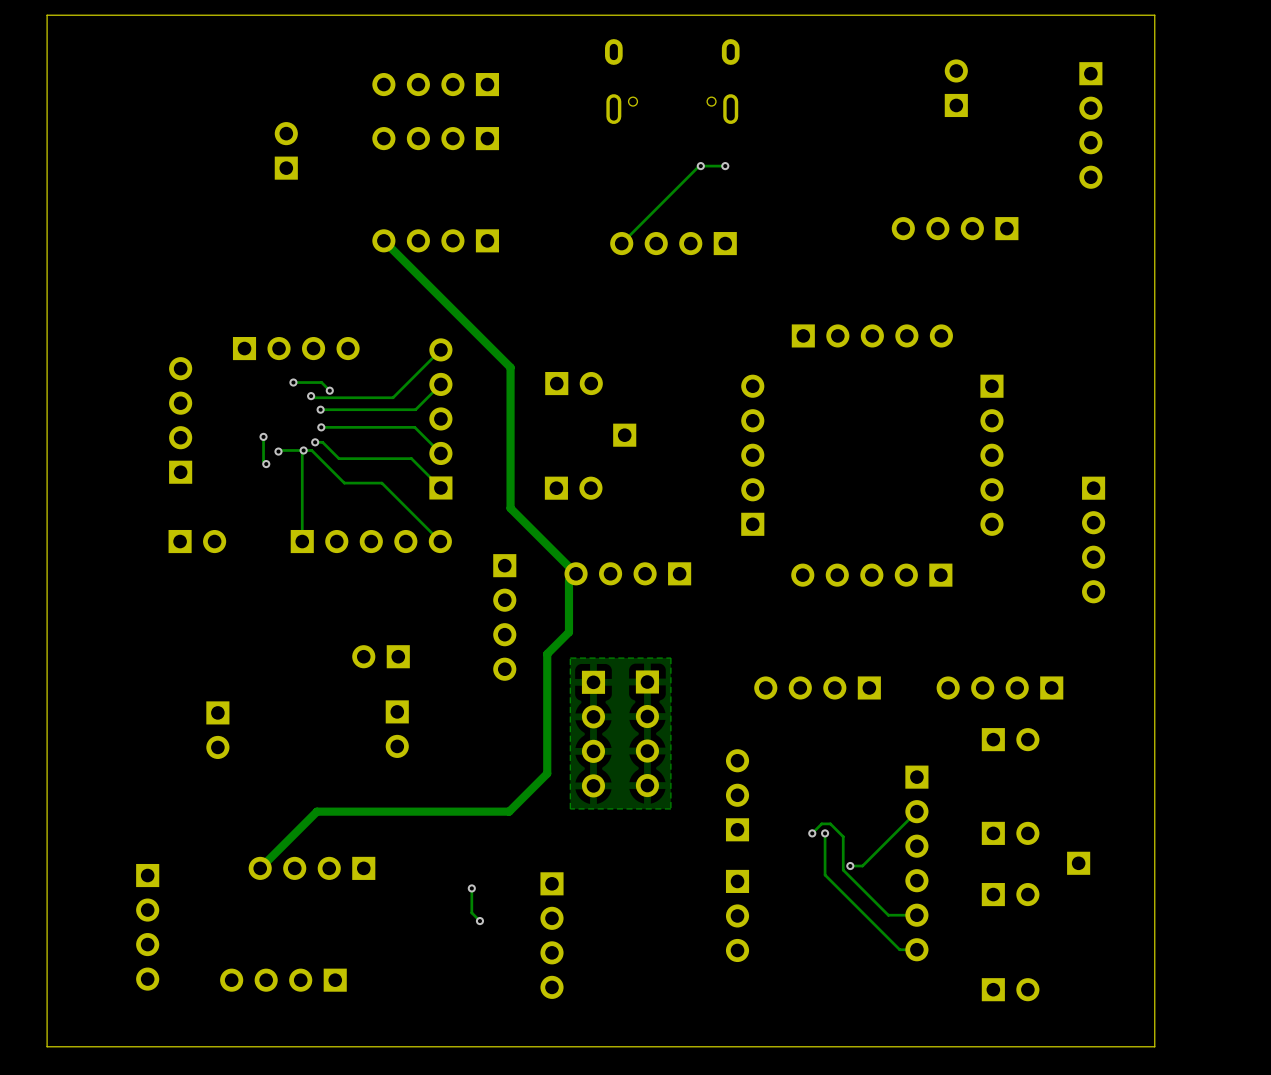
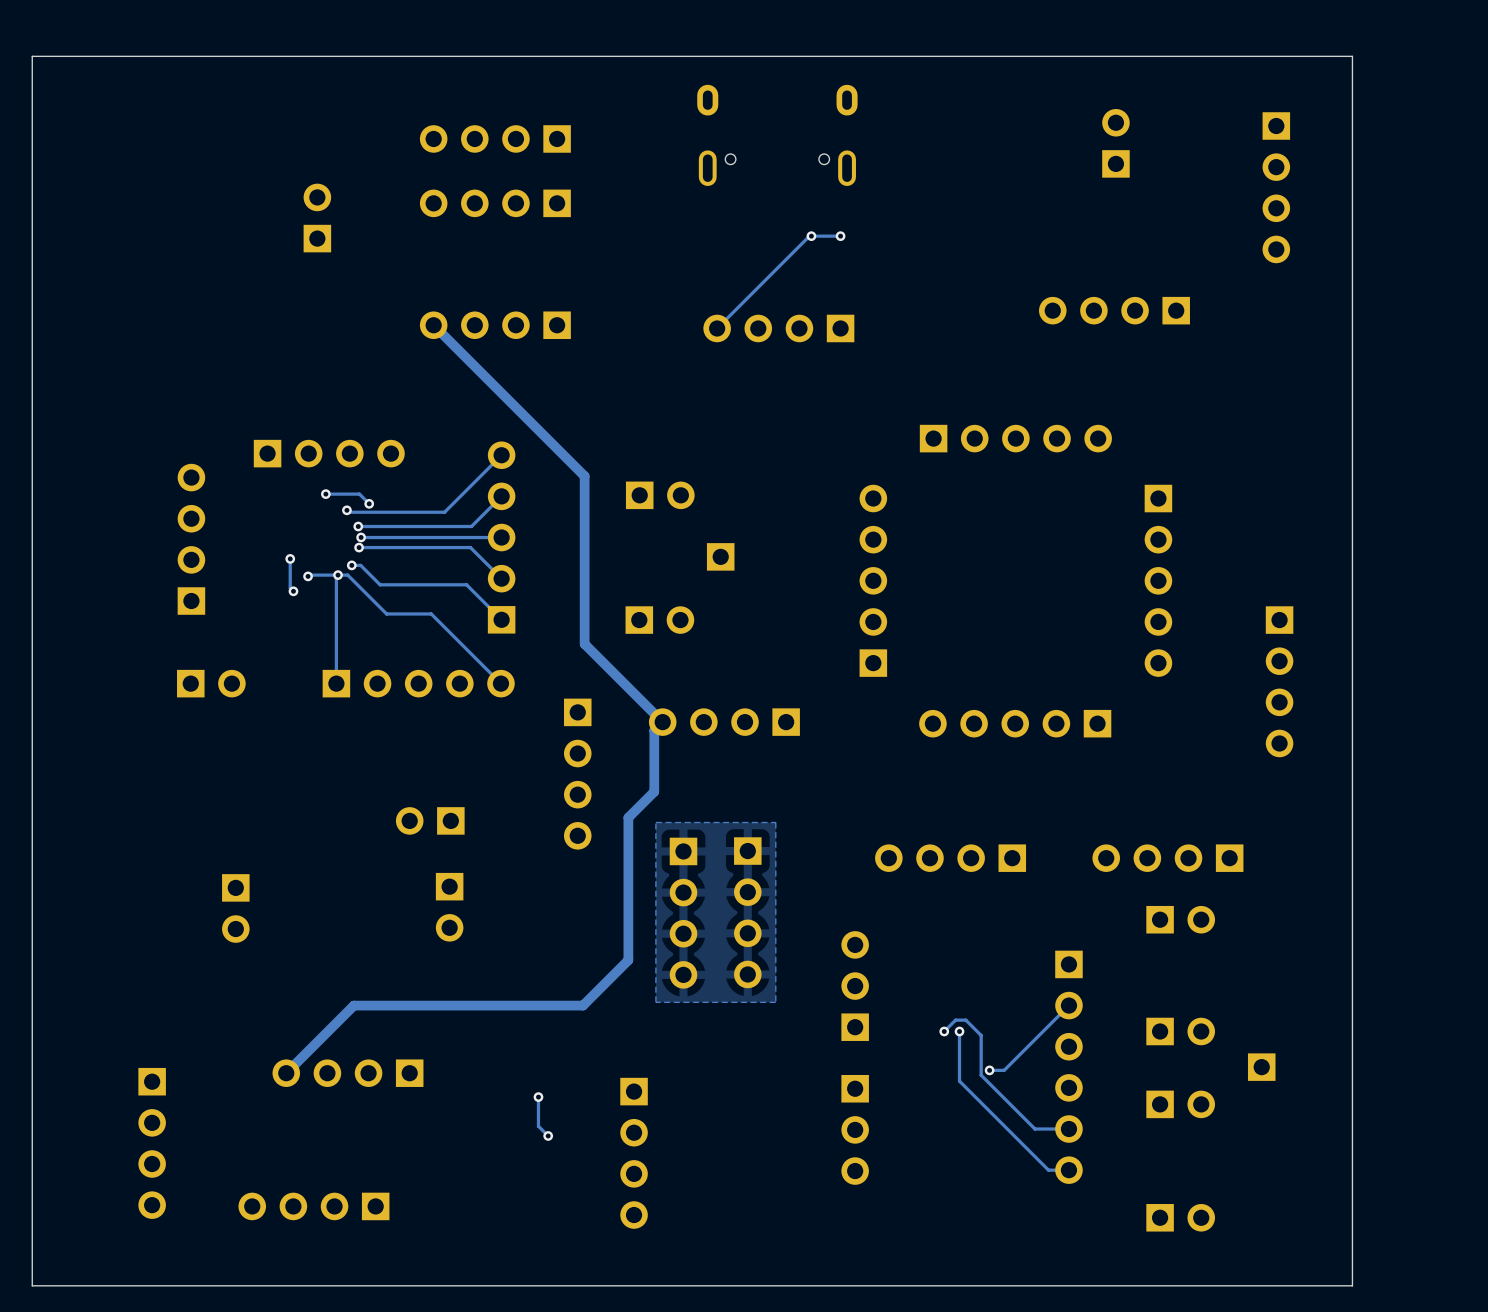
via: none -> (361, 537)
track: none -> (501, 537) (361, 537)

